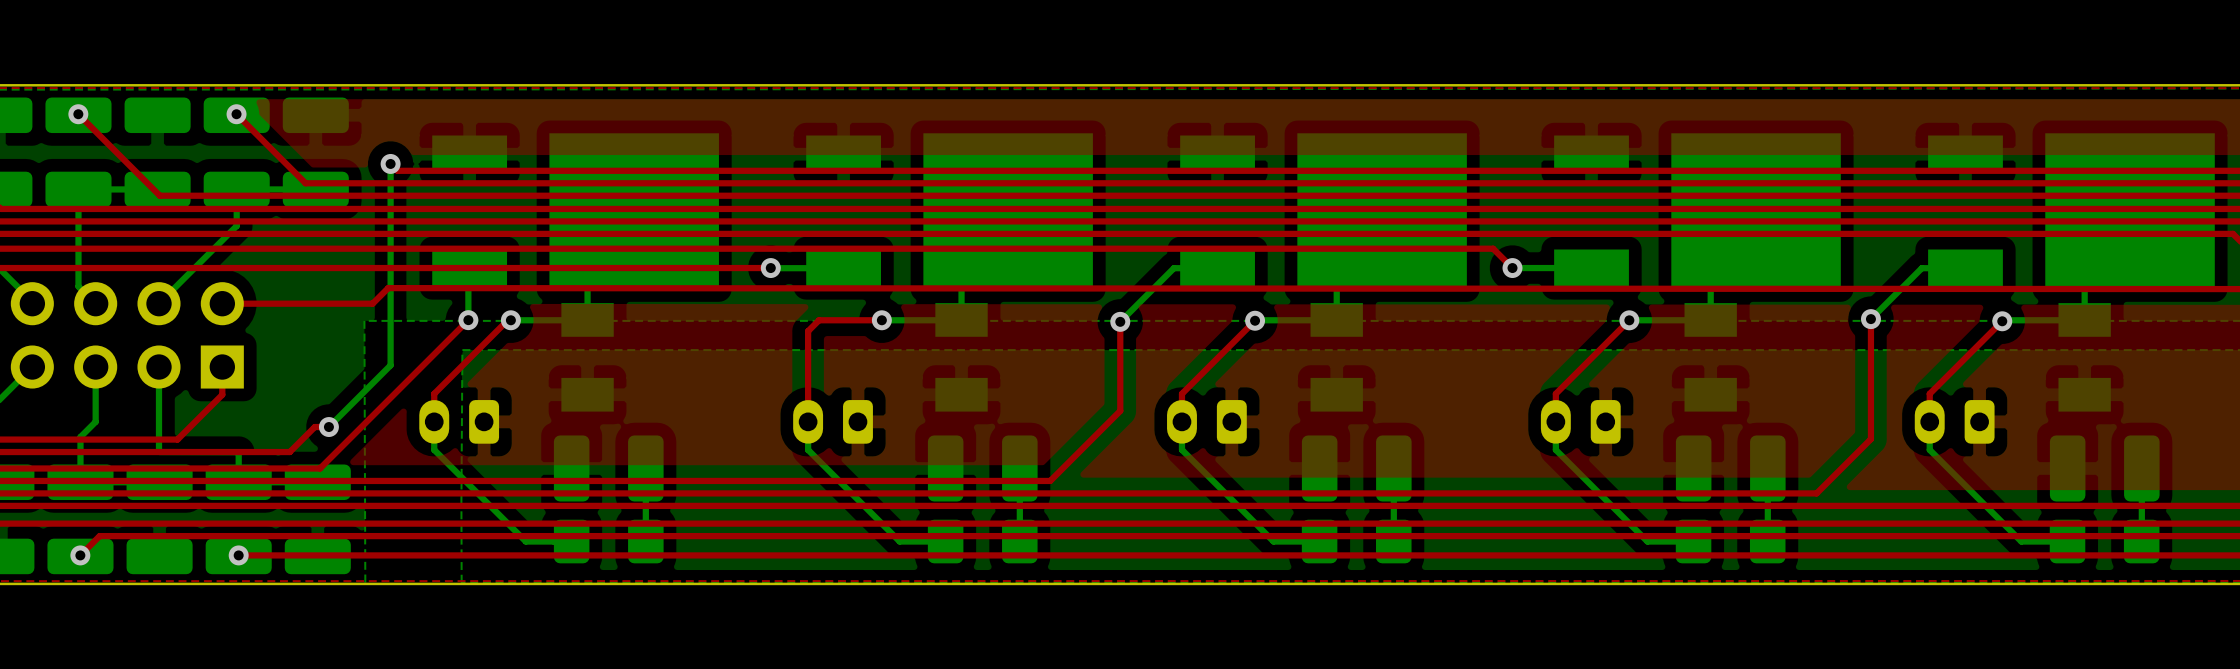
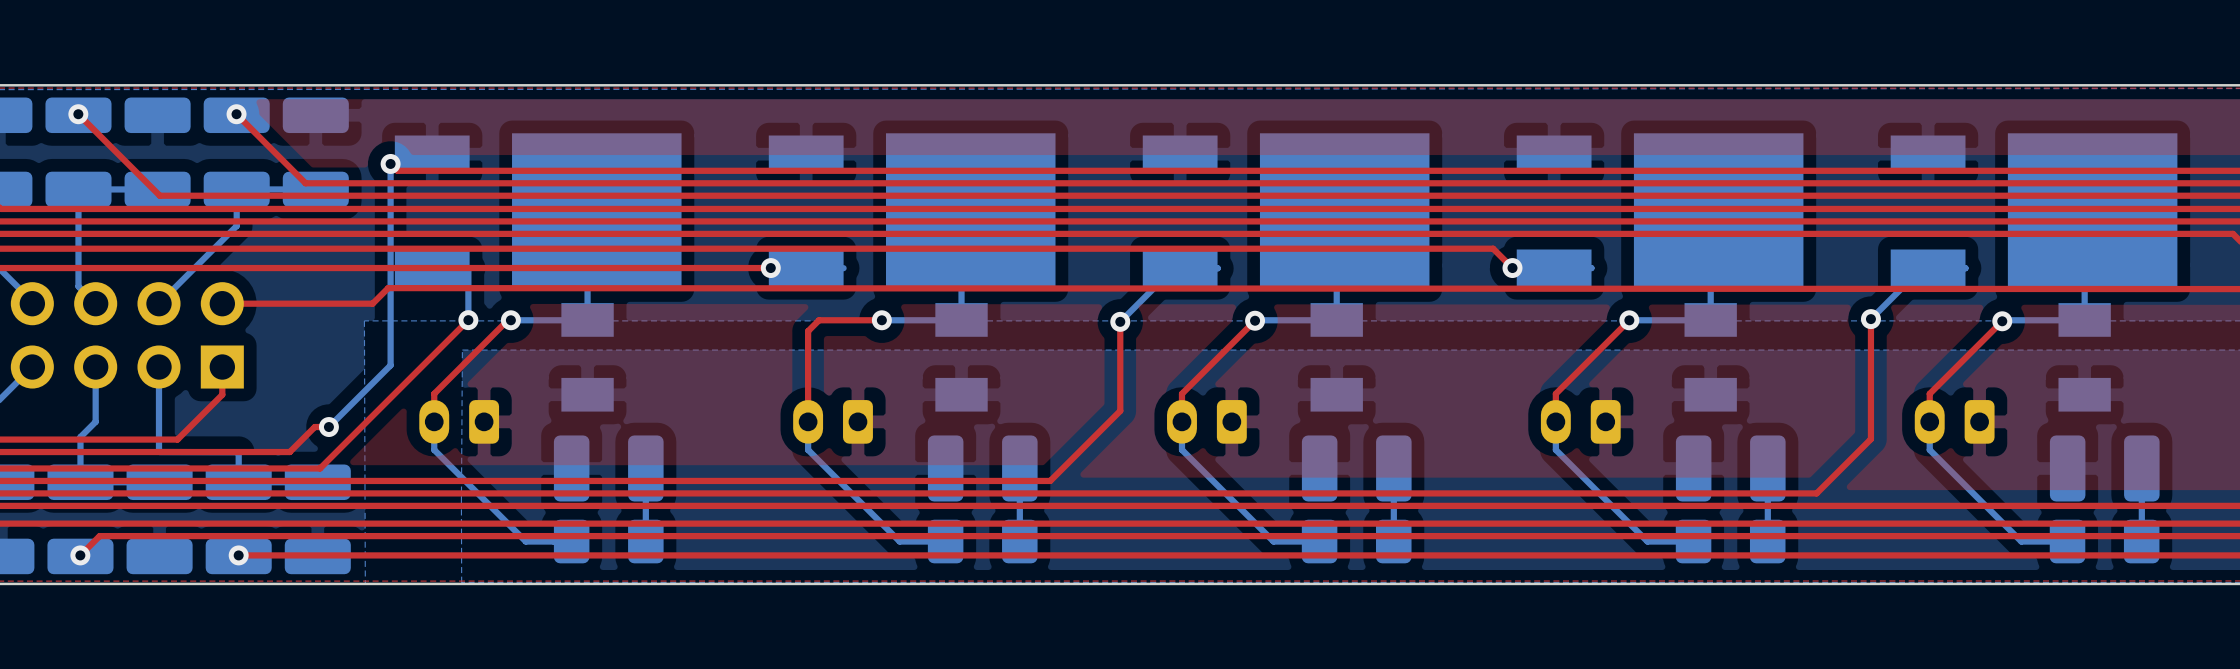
part position: (575, 211) -> (538, 211)
part position: (949, 211) -> (912, 211)
part position: (1323, 211) -> (1286, 211)
part position: (1697, 211) -> (1660, 211)
part position: (2071, 211) -> (2034, 211)

